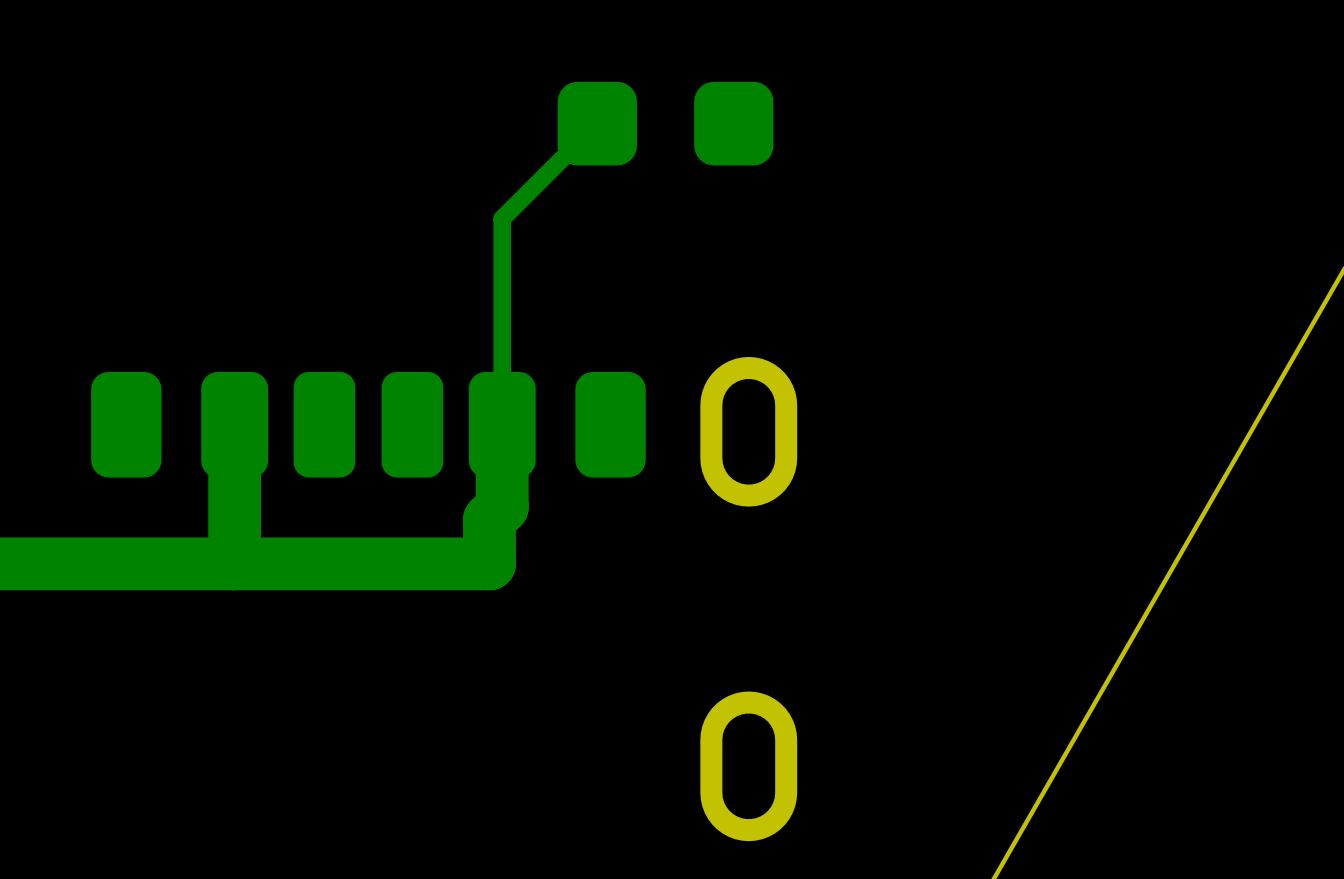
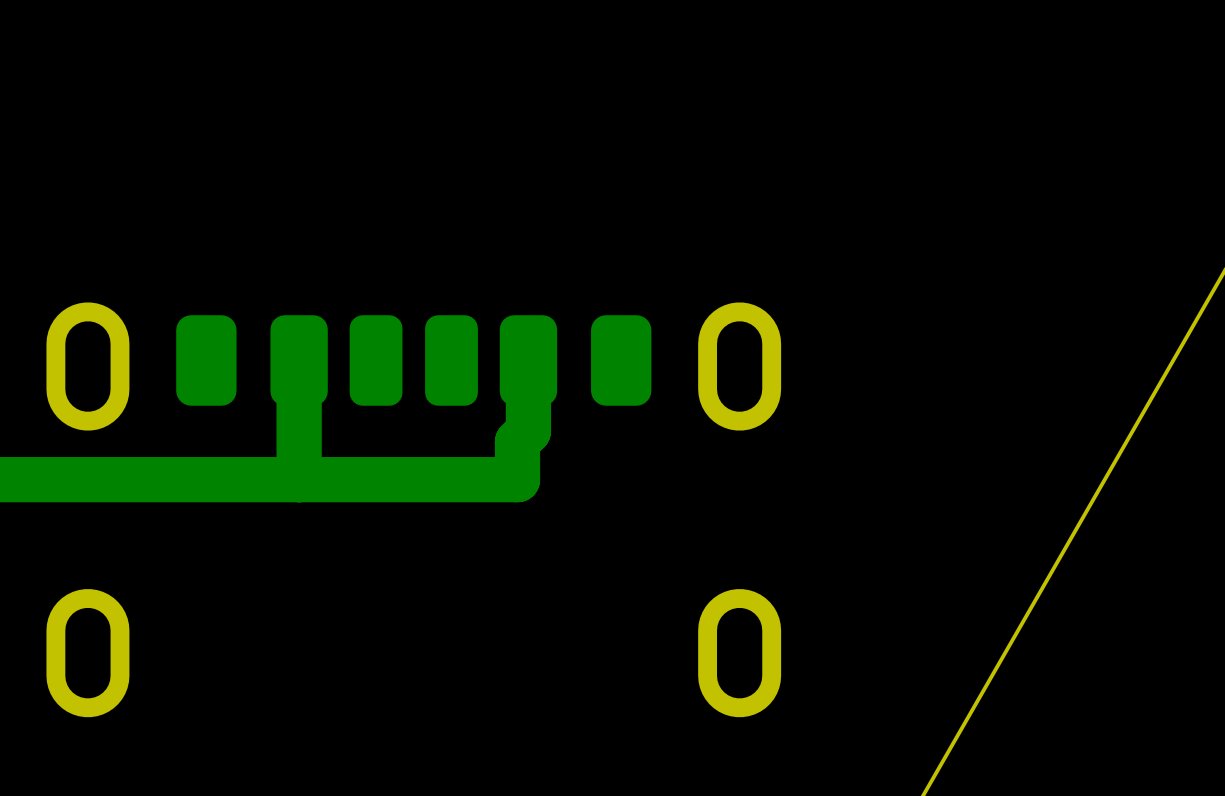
bottom track: (597, 123) (502, 218) (502, 428) -> none
part: (665, 123) -> none

